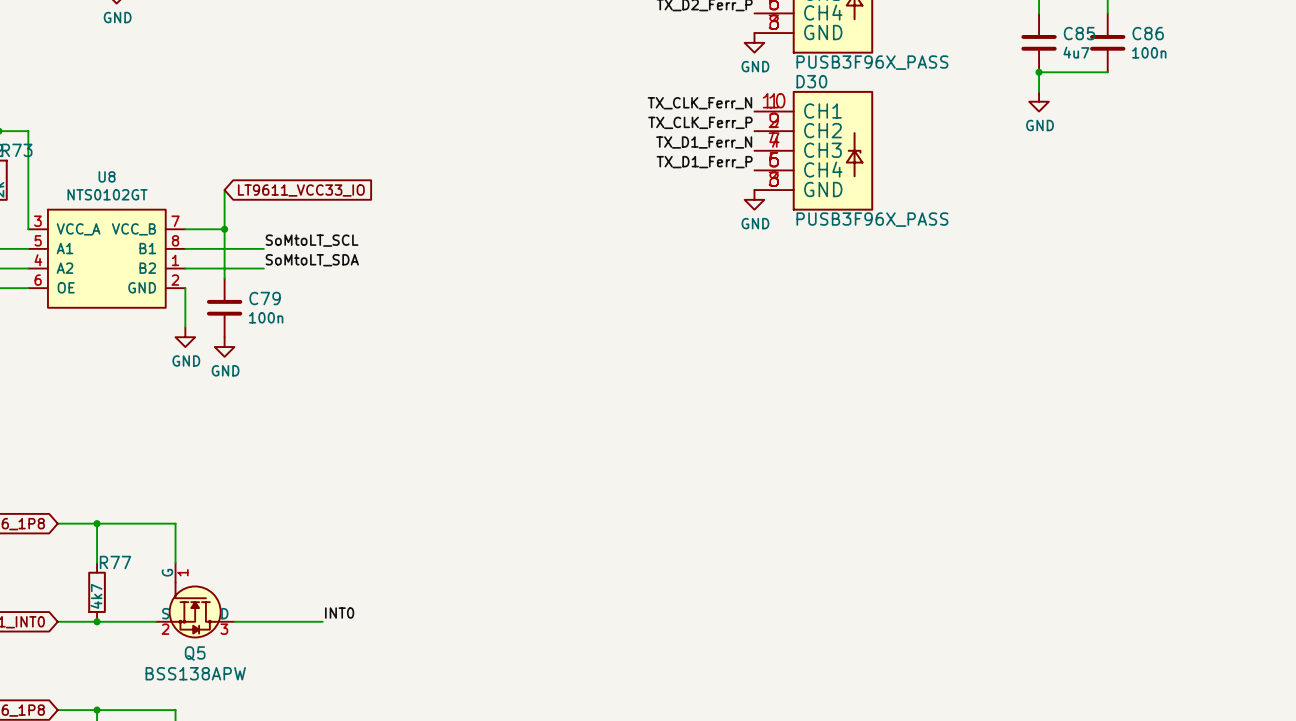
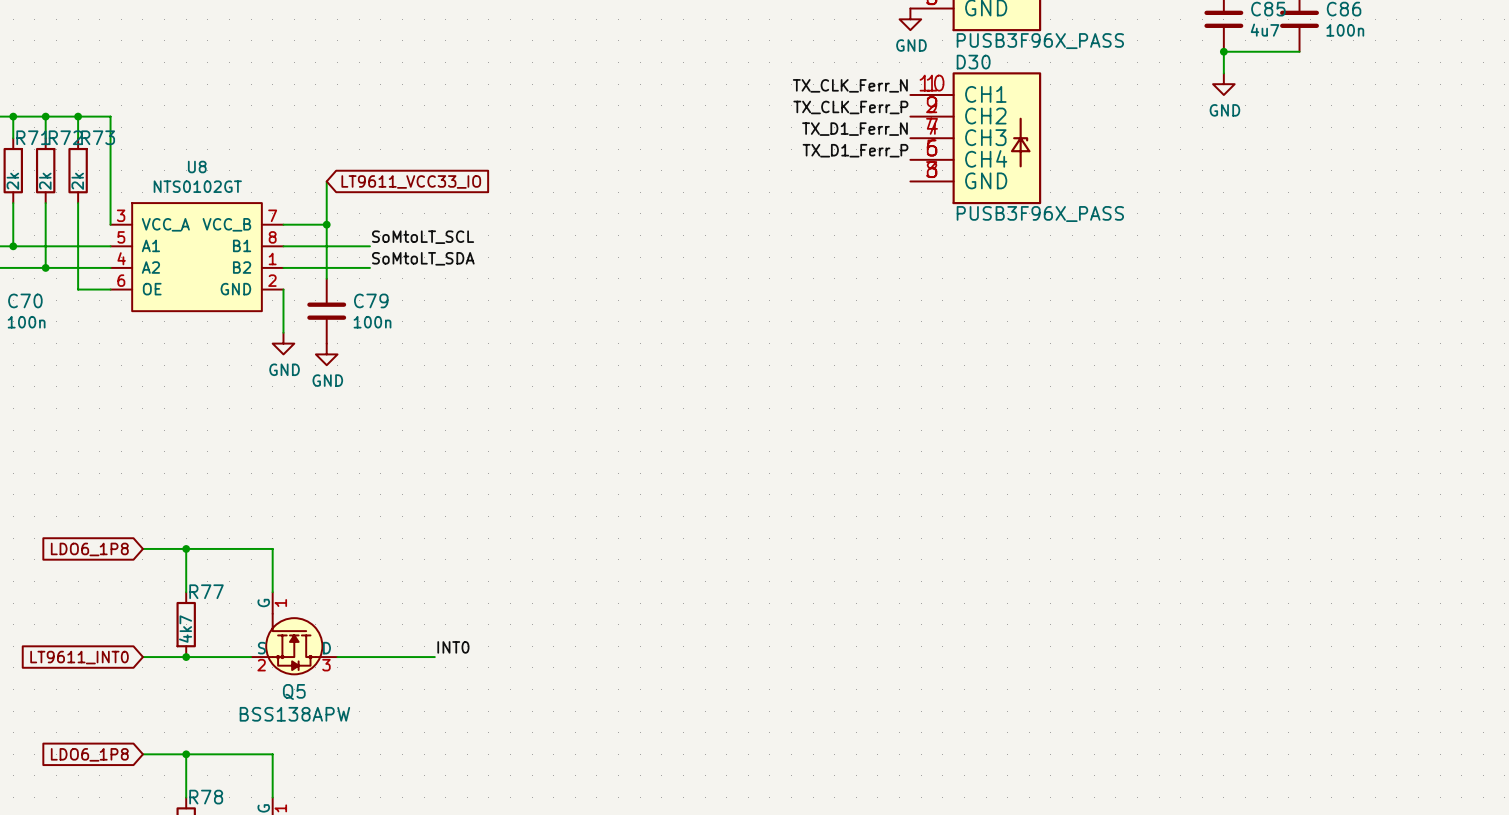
power symbol: GND (754, 199) -> none

